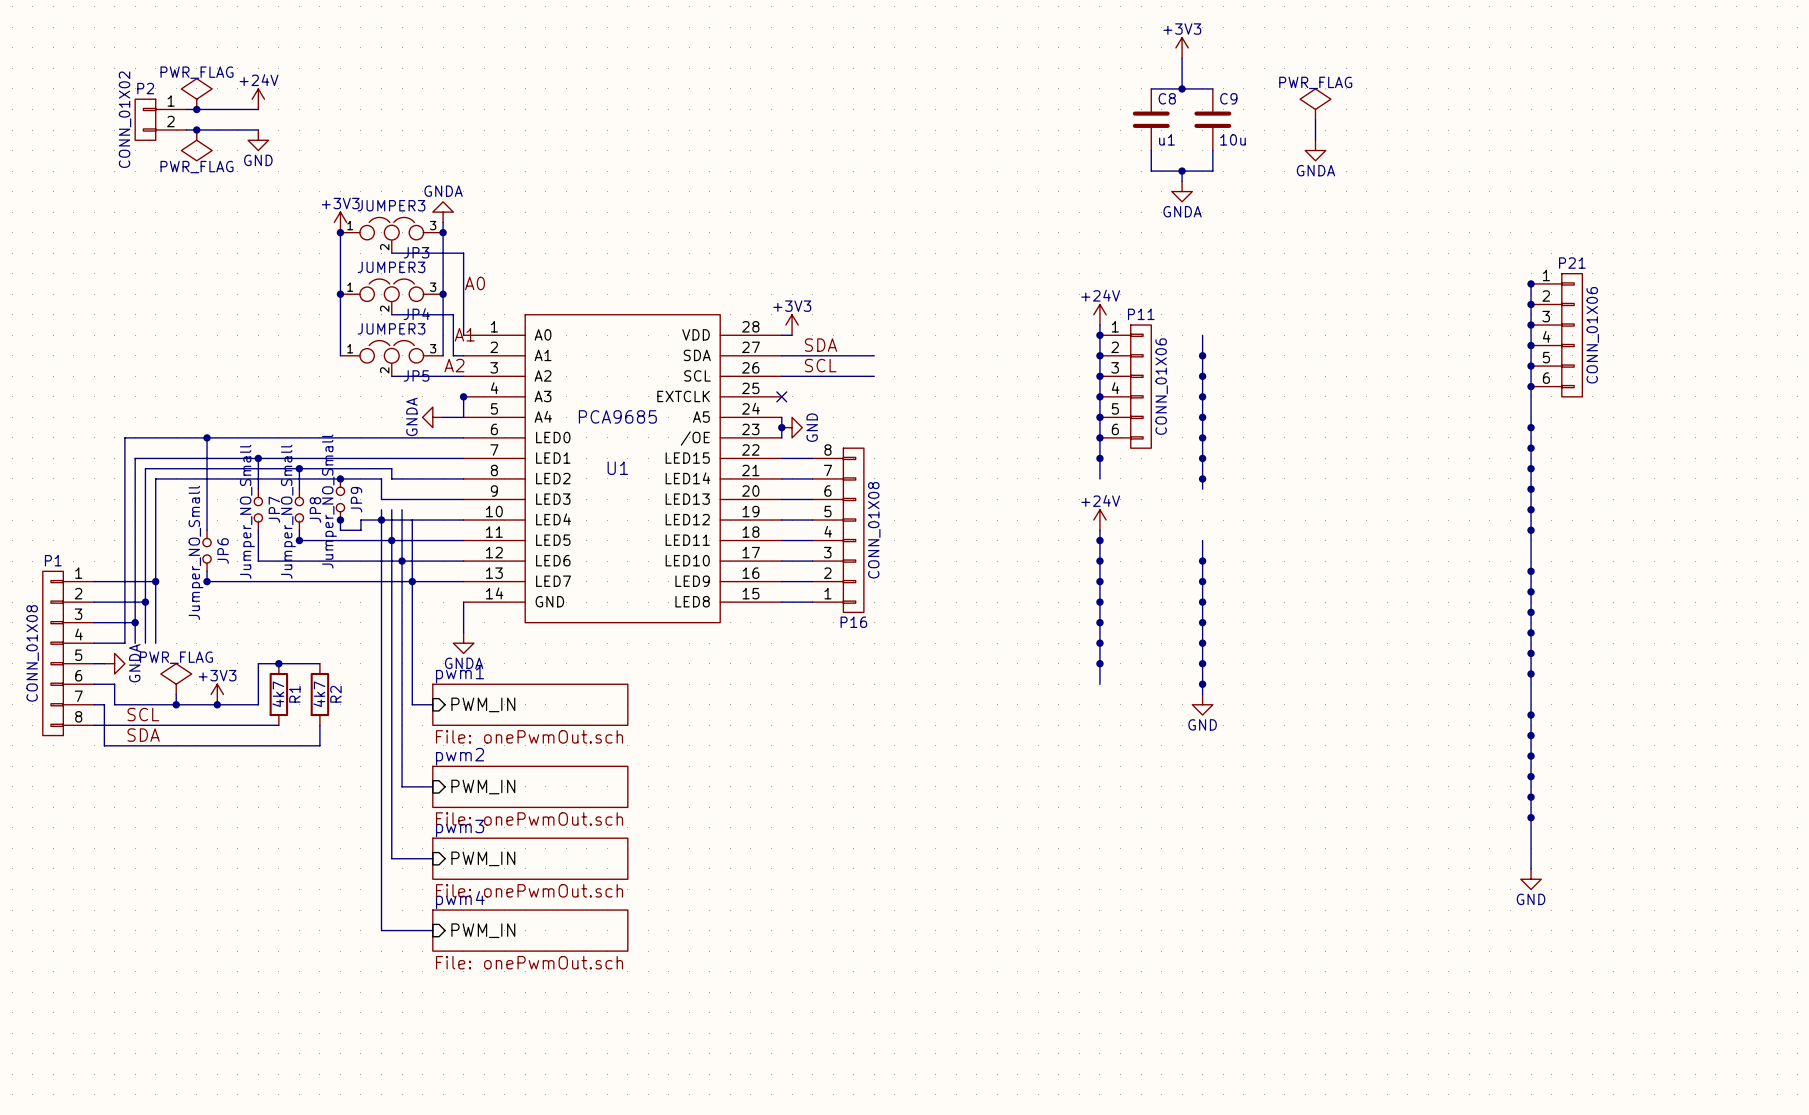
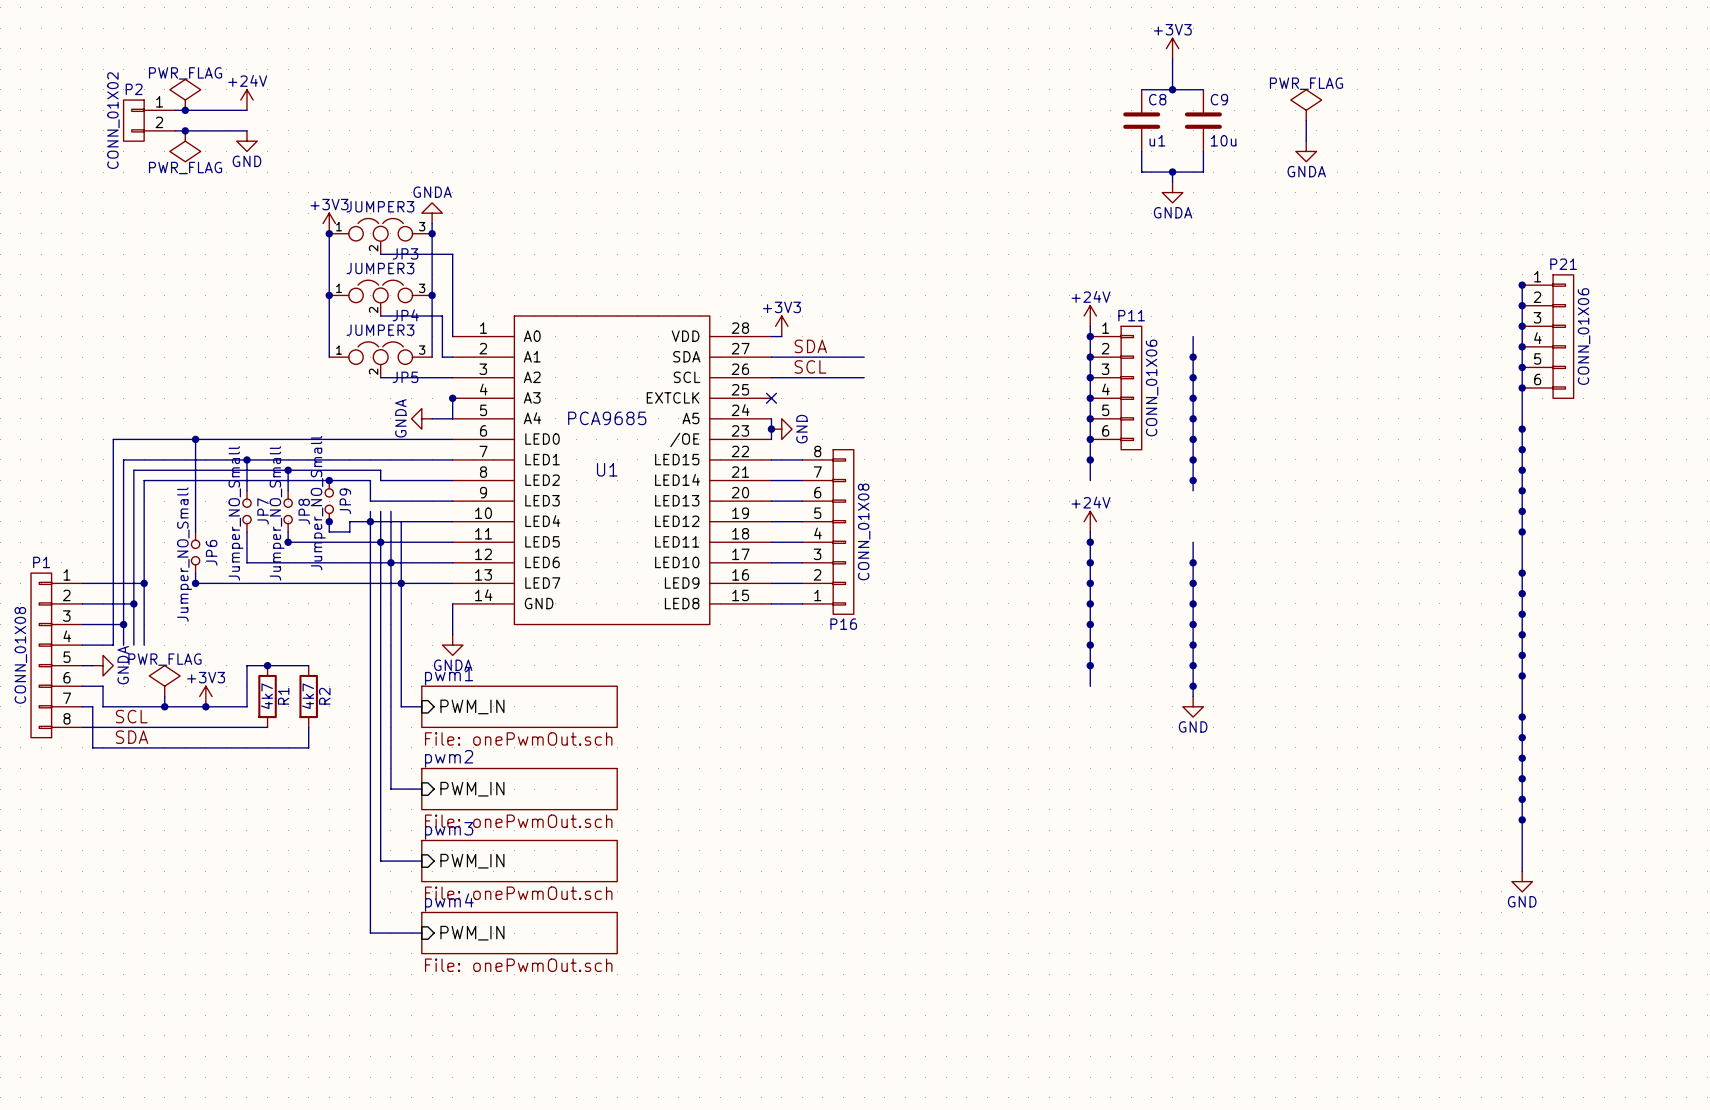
label: A0 (474, 283) -> none
label: A1 (464, 334) -> none
label: A2 (454, 365) -> none

